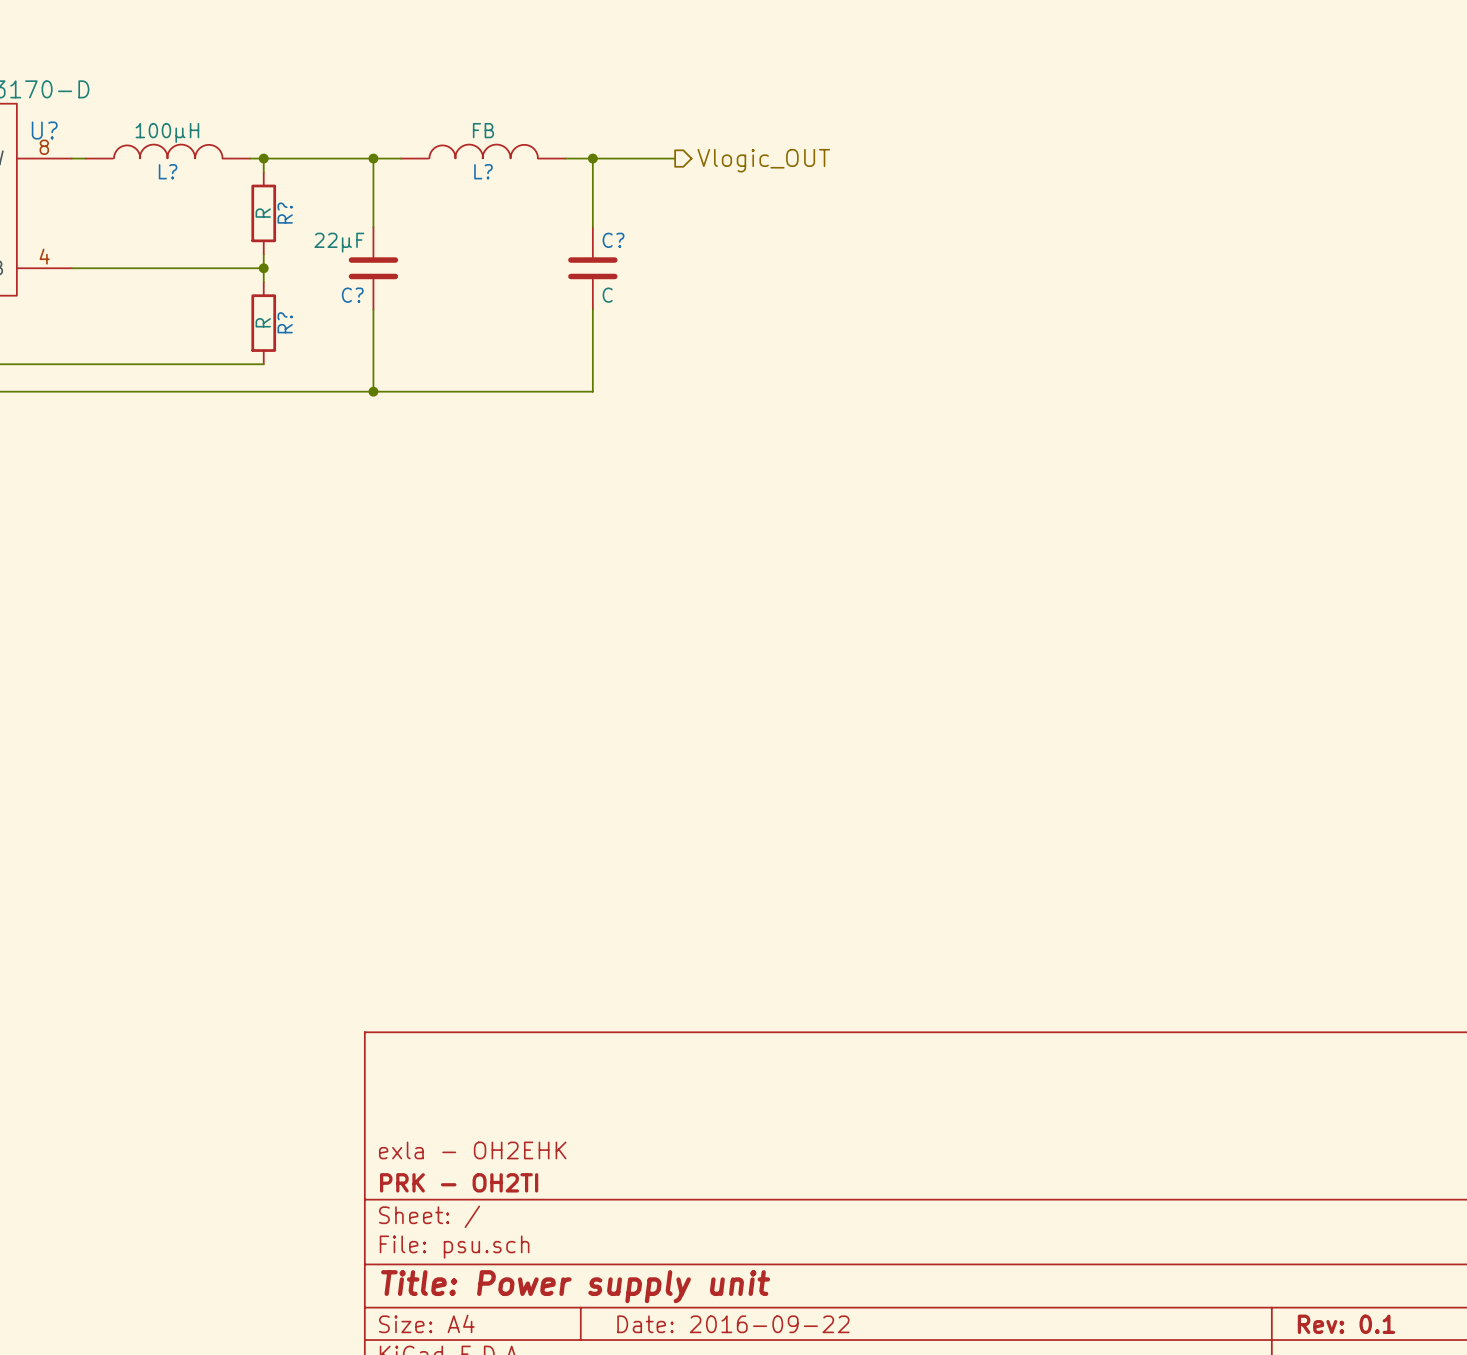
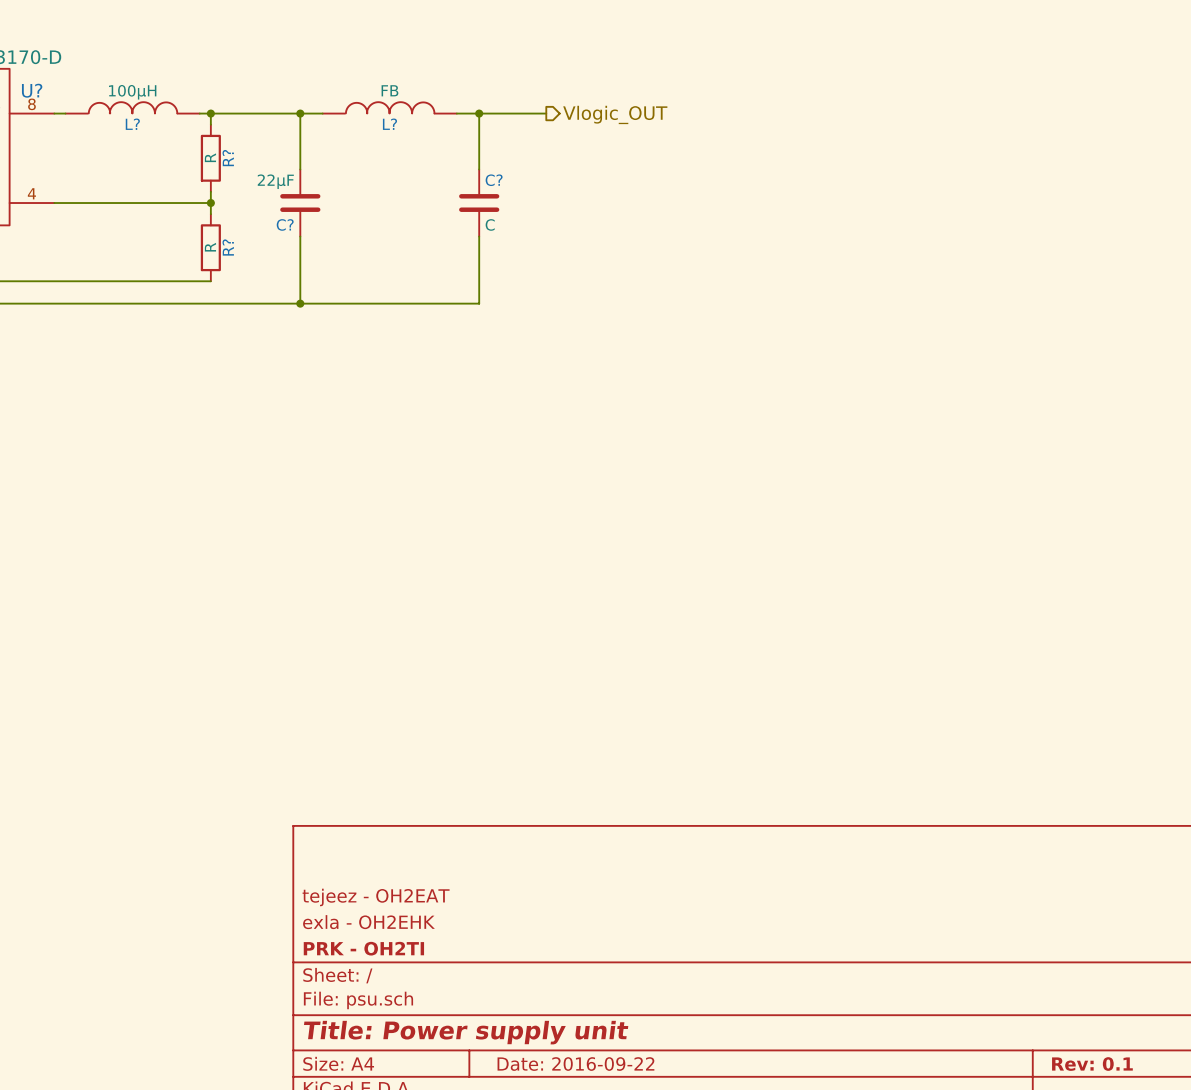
title block: none -> tejeez - OH2EAT (376, 897)

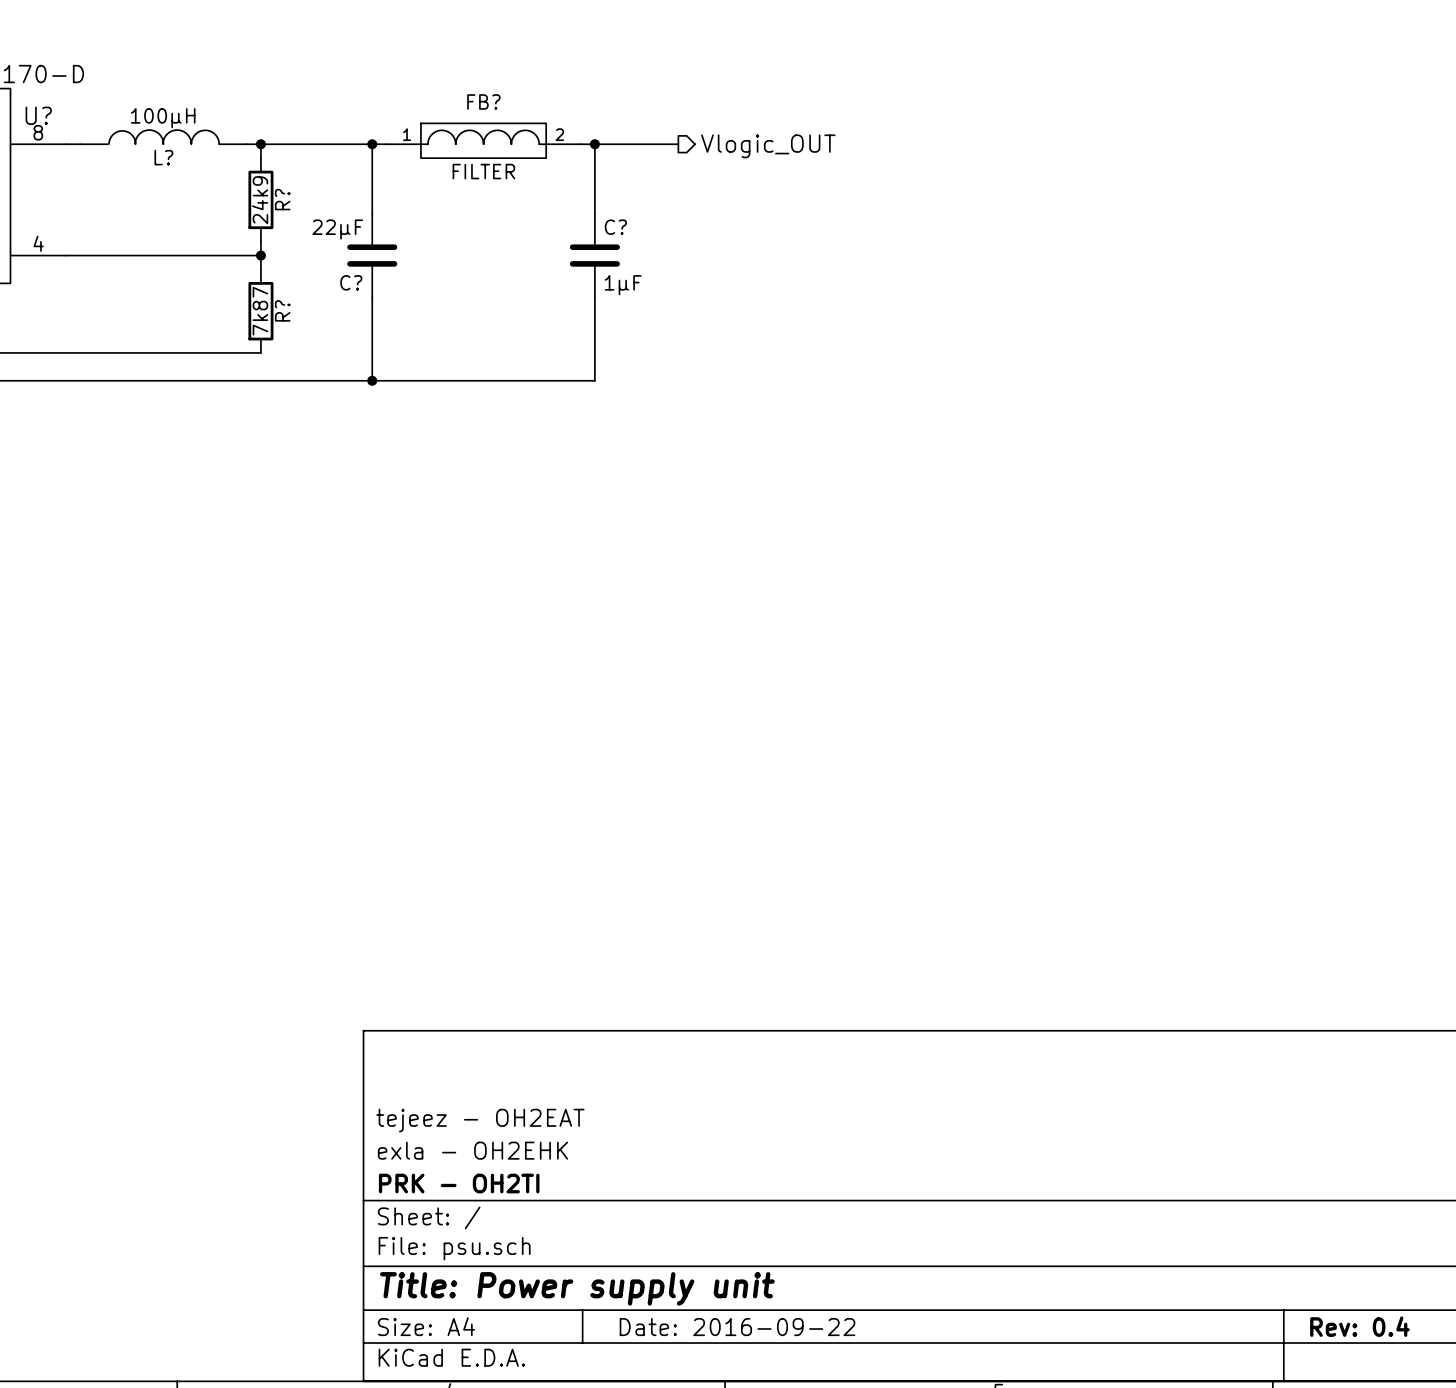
L?: FB (389, 107) -> none
FB?: none -> FILTER (483, 140)
R? value: R (210, 157) -> 24k9 (260, 200)
C? value: C (490, 224) -> 1µF (623, 285)
R? value: R (210, 247) -> 7k87 (260, 311)
title block: Rev: 0.1 (1092, 1064) -> Rev: 0.4 (1359, 1326)

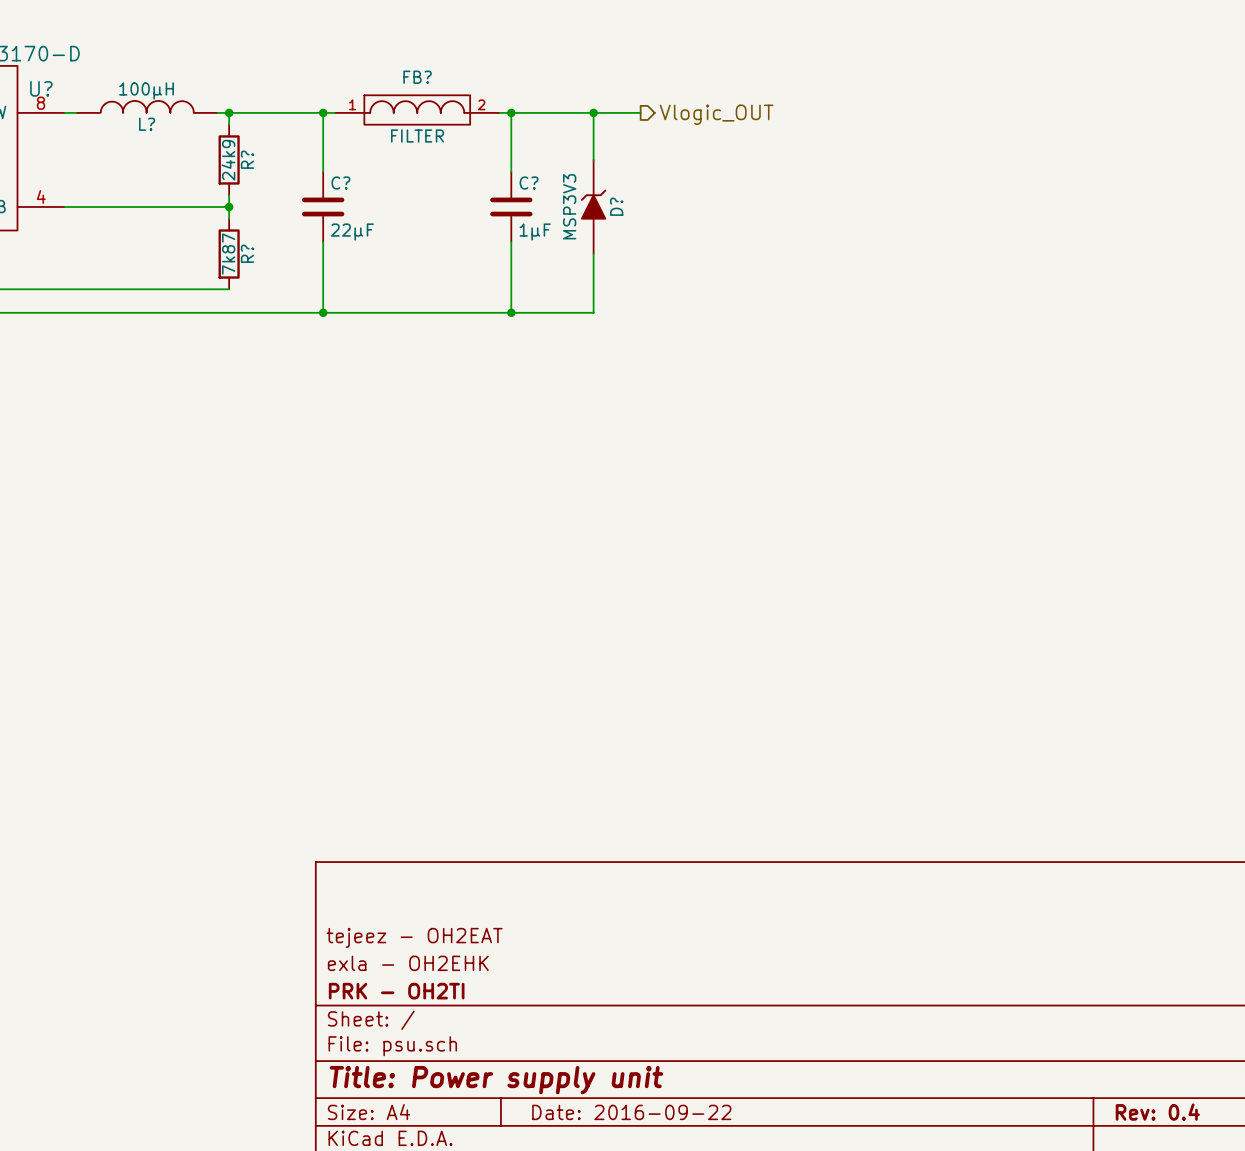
wire: none -> (581, 112) (640, 112)
wire: none -> (593, 112) (593, 159)
junction: none -> (593, 112)
hierarchical label position: Vlogic_OUT (768, 146) -> Vlogic_OUT (716, 114)
C? value position: 22µF (337, 229) -> 22µF (352, 232)
D?: none -> MSP3V3 (593, 206)
C? name position: C? (351, 282) -> C? (340, 183)
wire: none -> (593, 254) (593, 312) (511, 312)
junction: none -> (511, 312)

